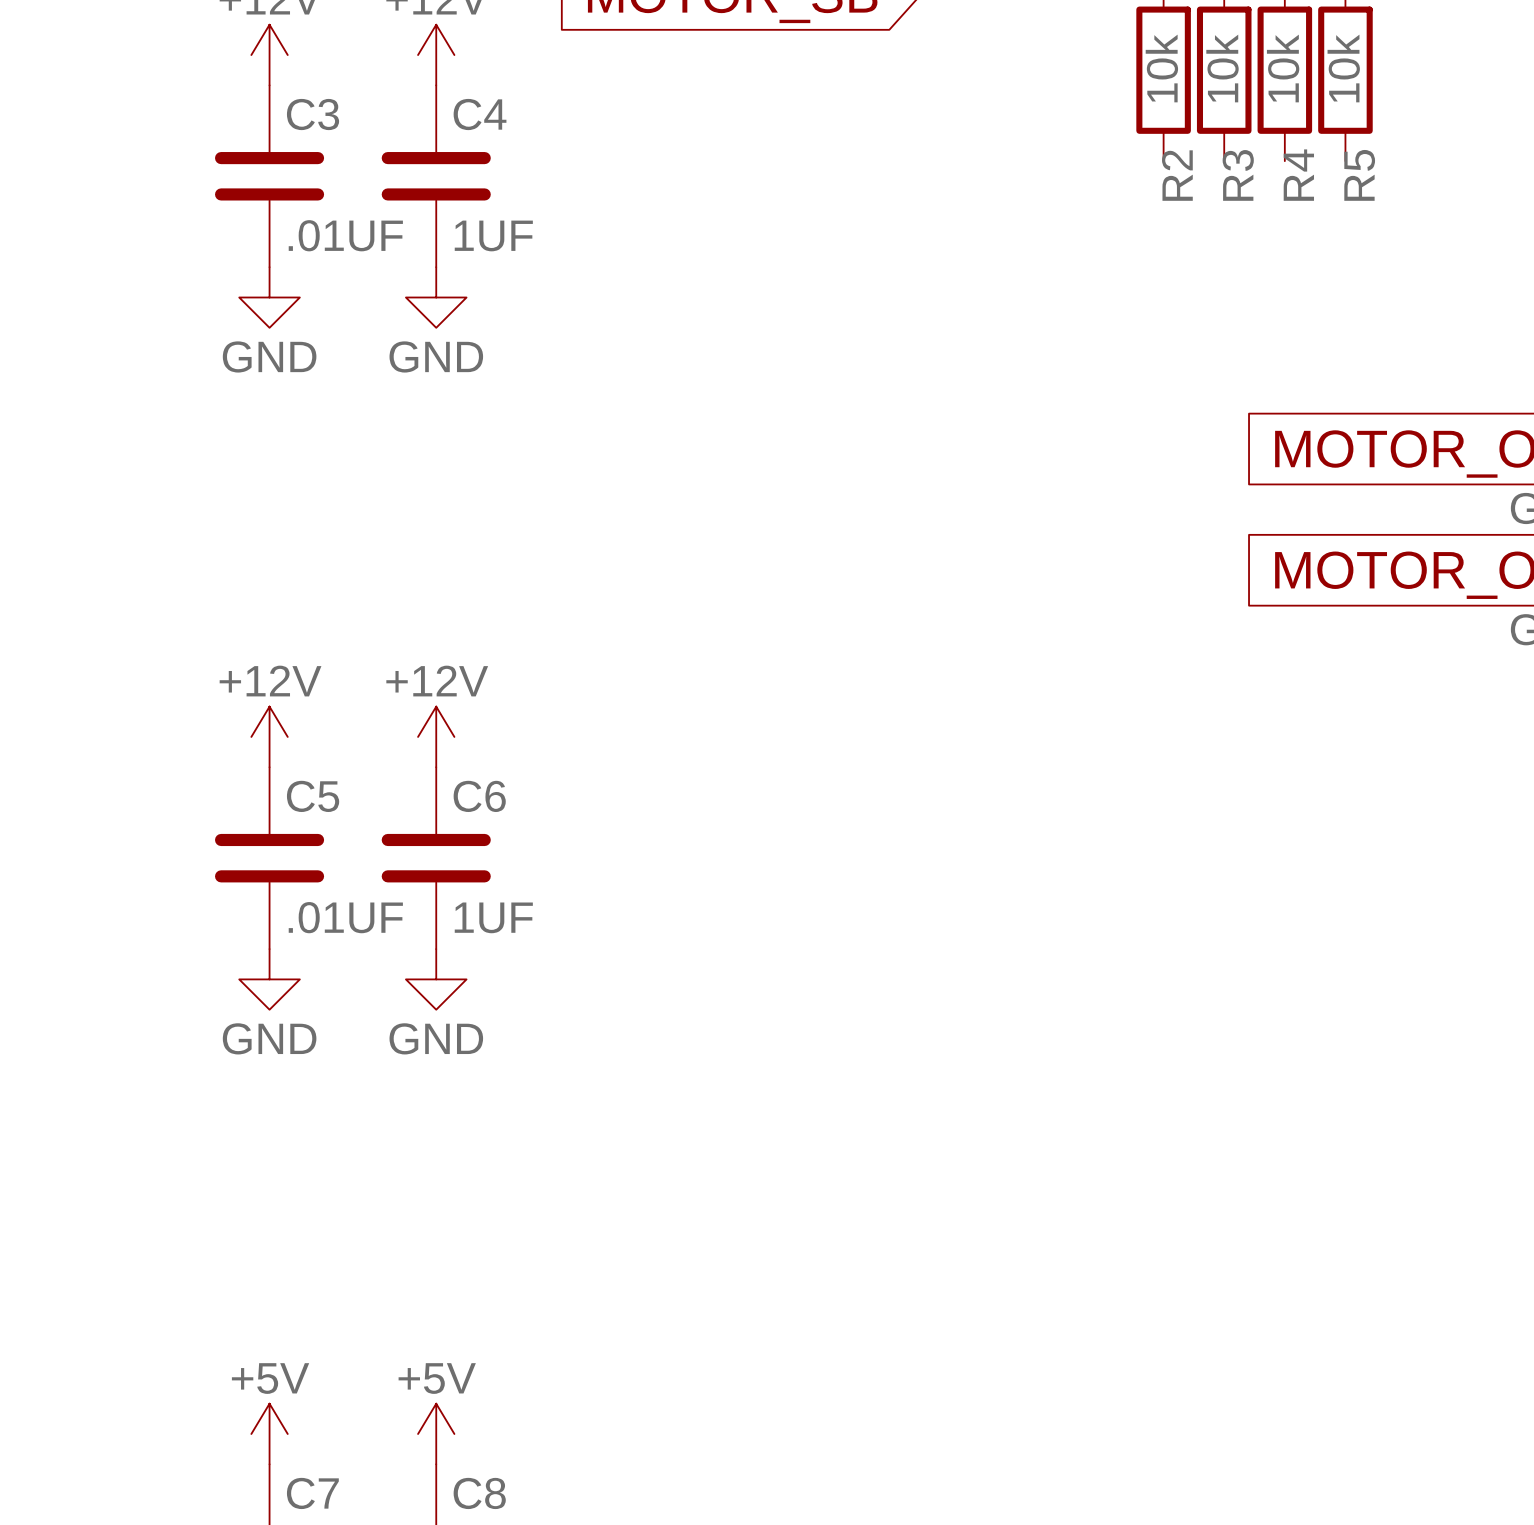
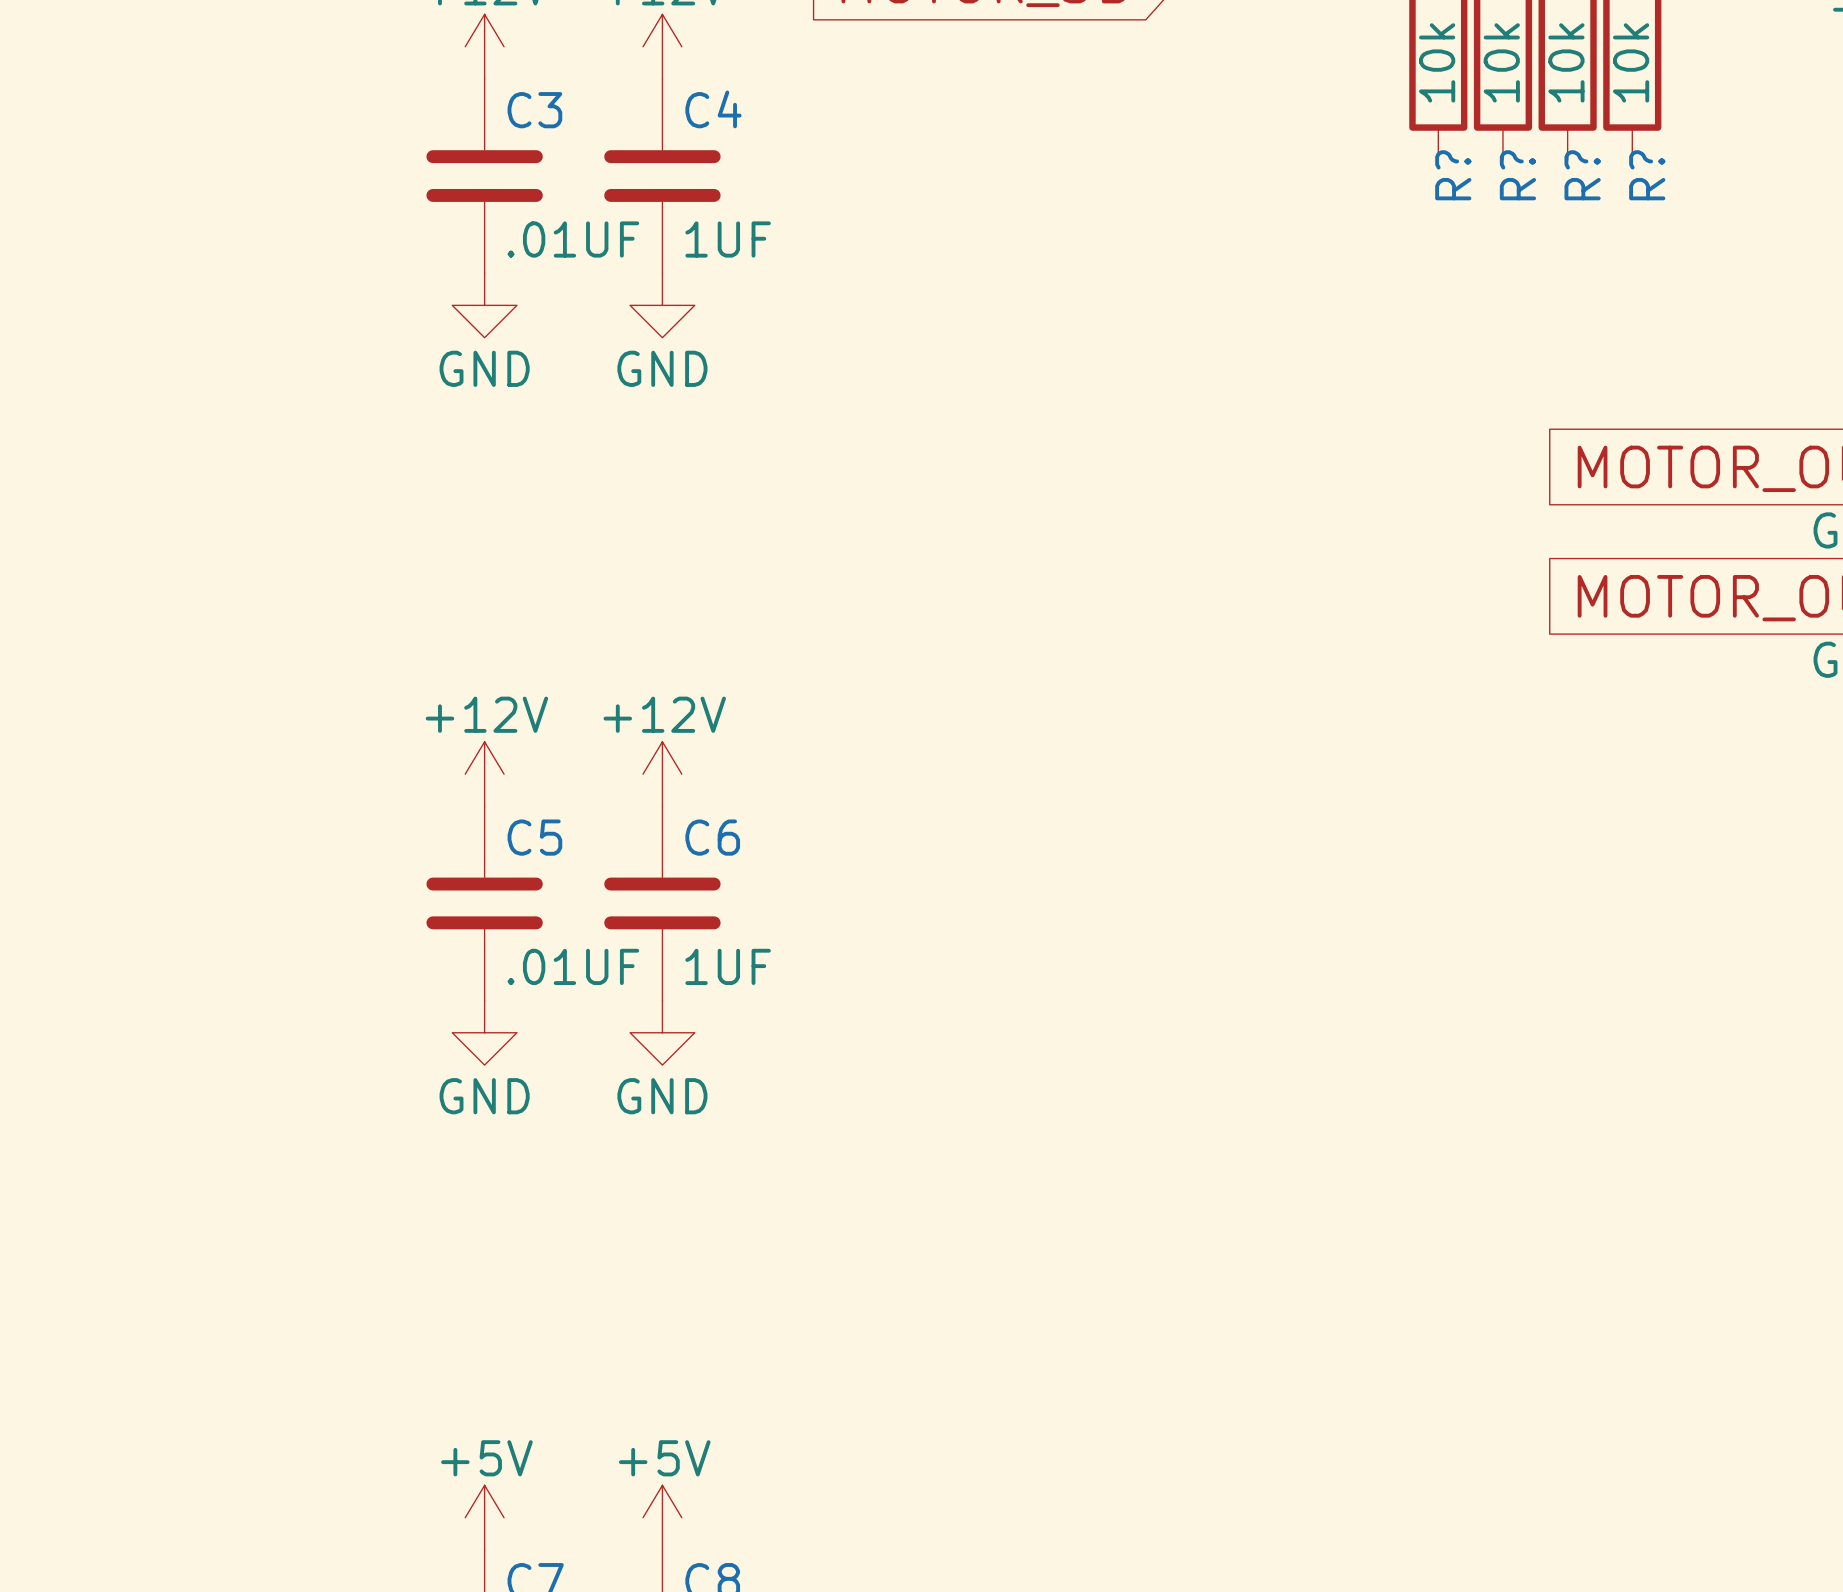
R2 name: R2 (1177, 175) -> R? (1453, 175)
R3 name: R3 (1238, 175) -> R? (1517, 175)
R4 name: R4 (1298, 175) -> R? (1582, 175)
R5 name: R5 (1359, 175) -> R? (1647, 175)

